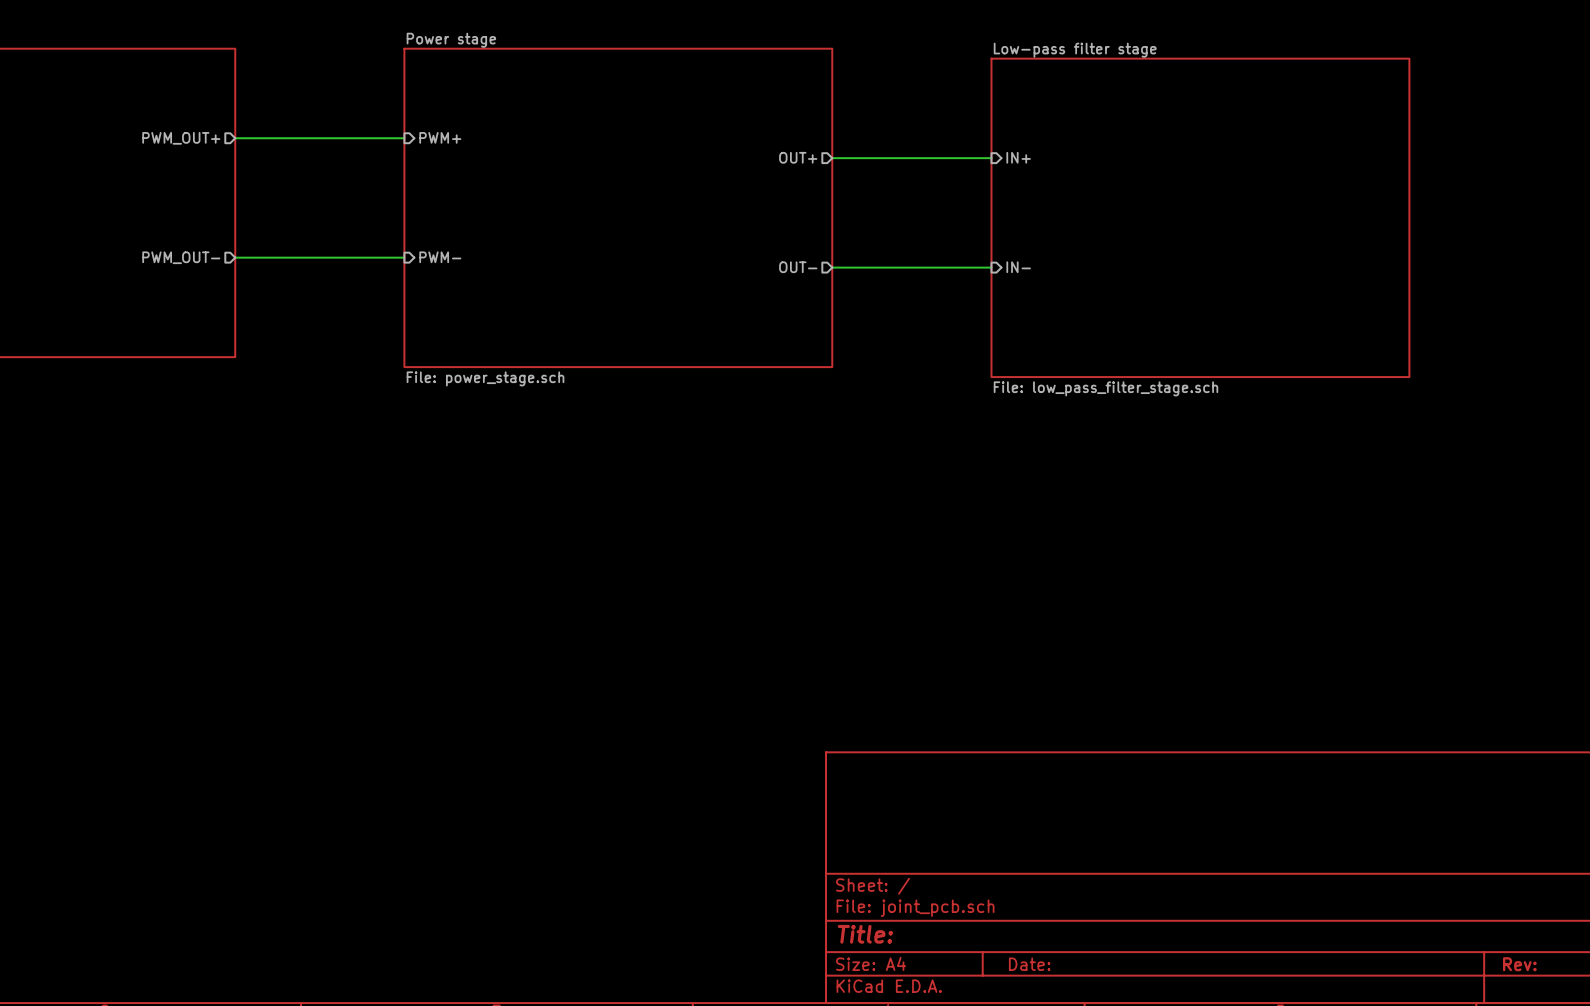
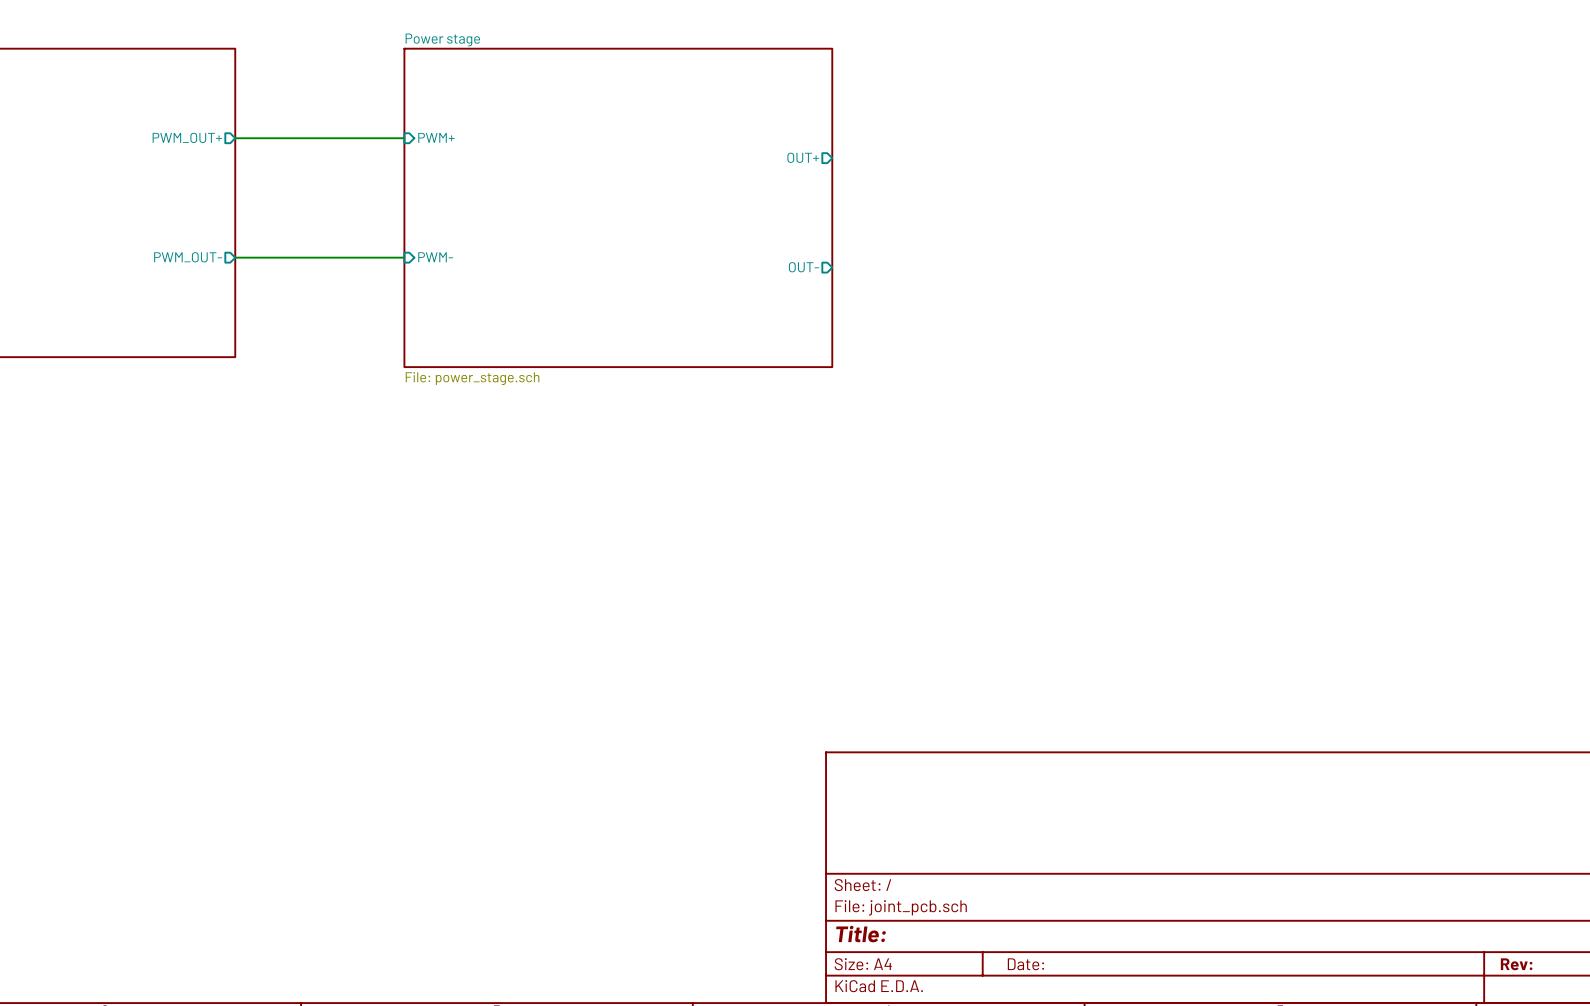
sheet pin: IN+ (1018, 157) -> none
wire: (832, 158) (991, 158) -> none
sheet Low-pass filter stage: File: low_pass_filter_stage.sch (1200, 217) -> none
wire: (832, 267) (991, 267) -> none
sheet pin: IN- (1018, 267) -> none

